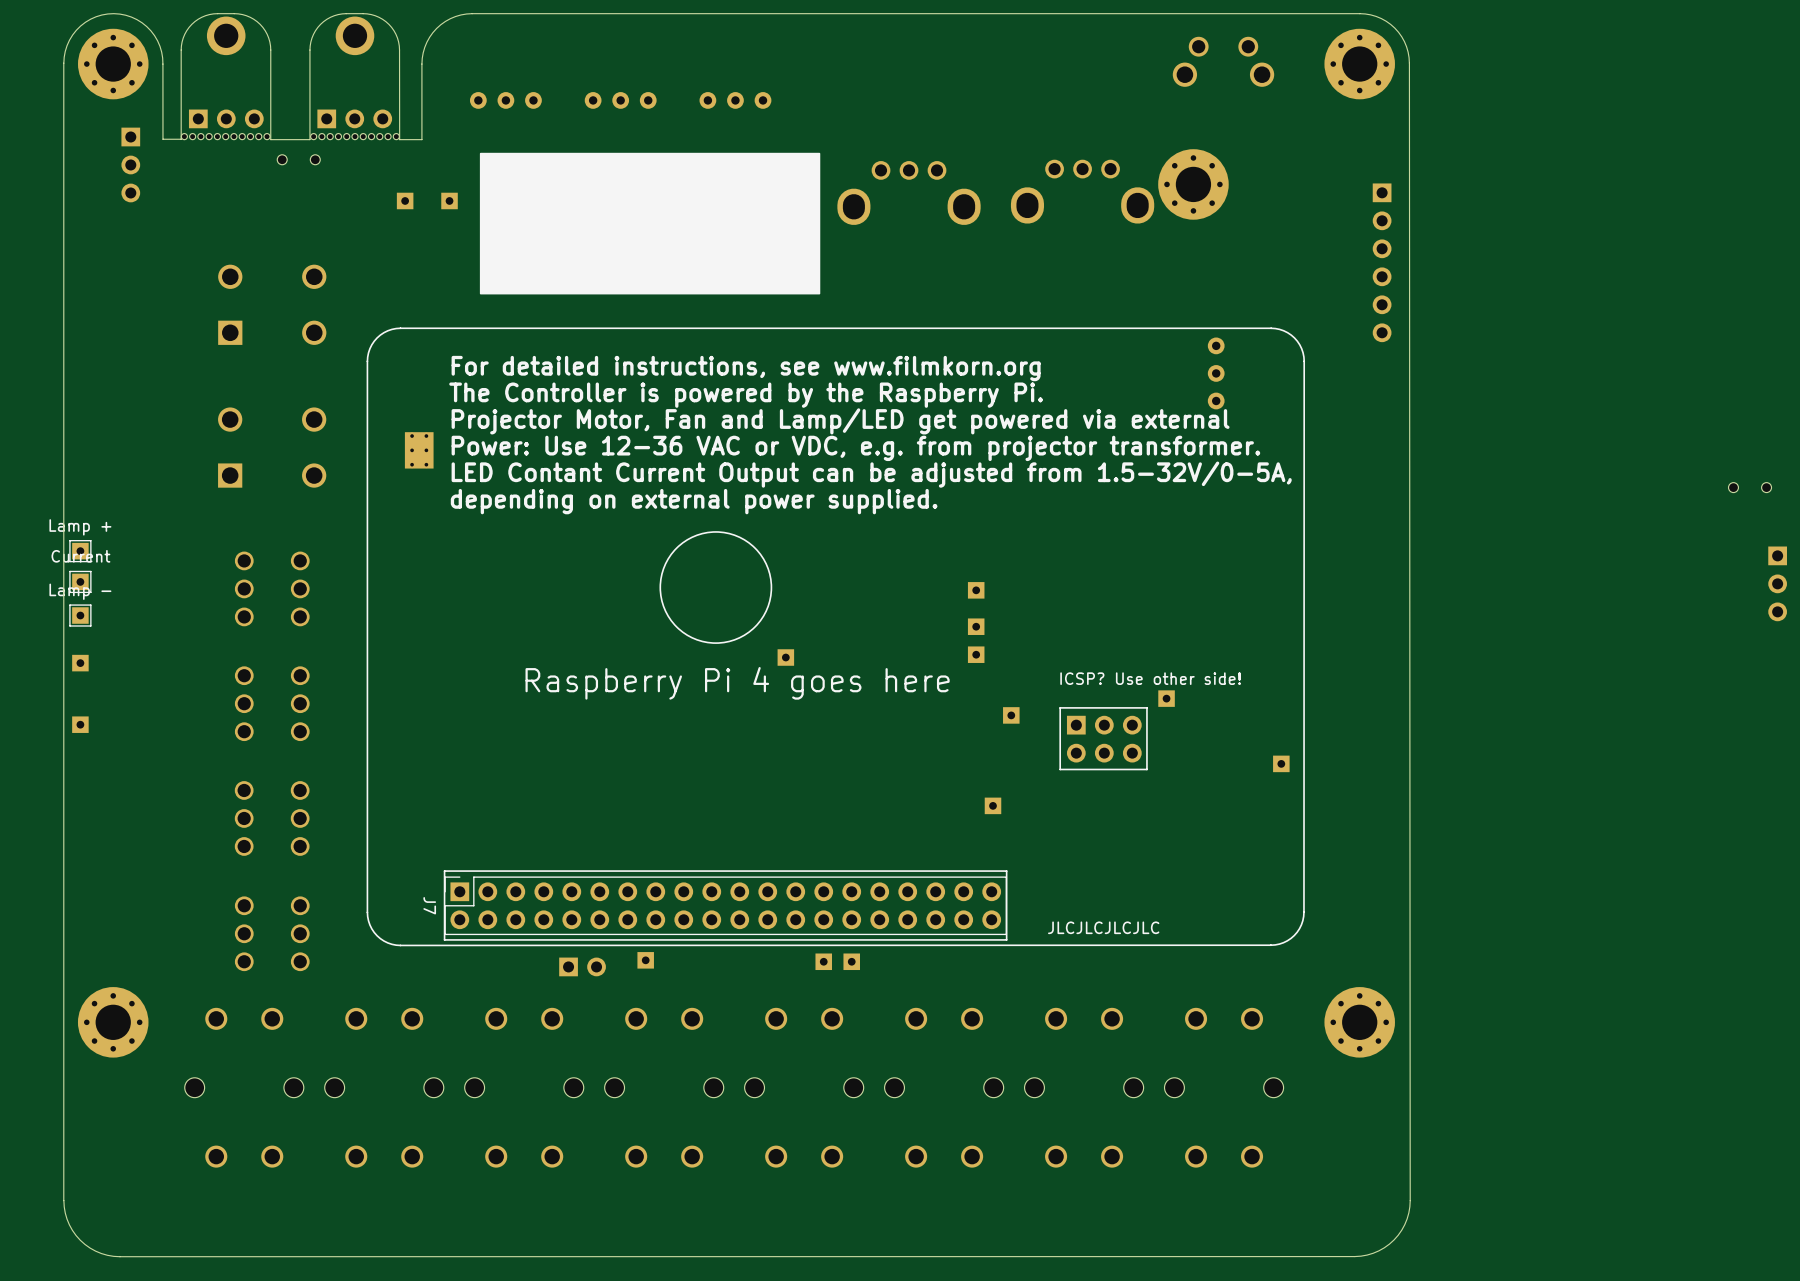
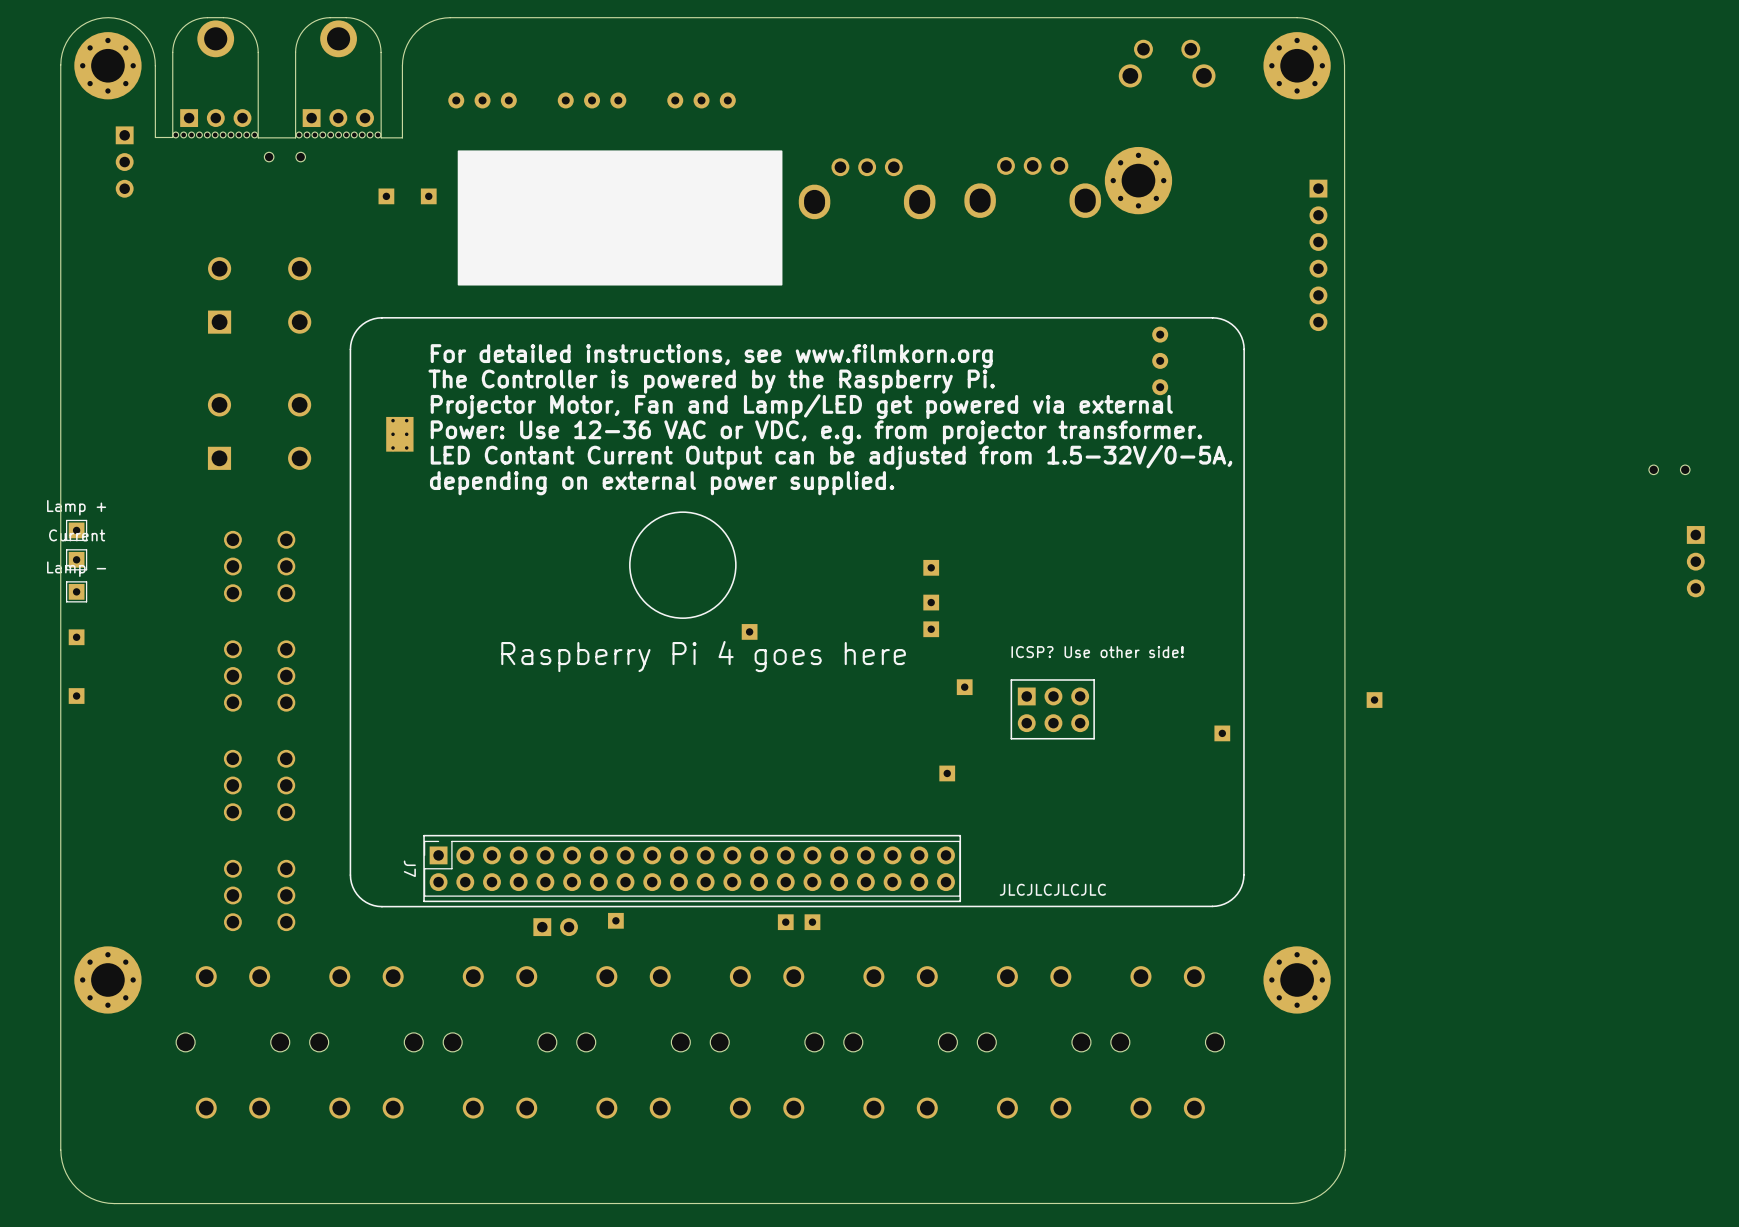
part: (1166, 698) -> none
part: none -> (1374, 700)

